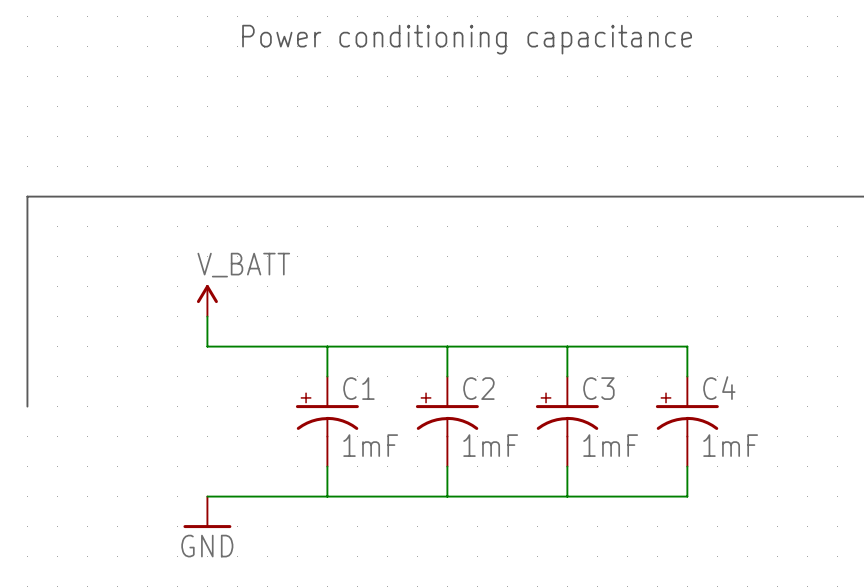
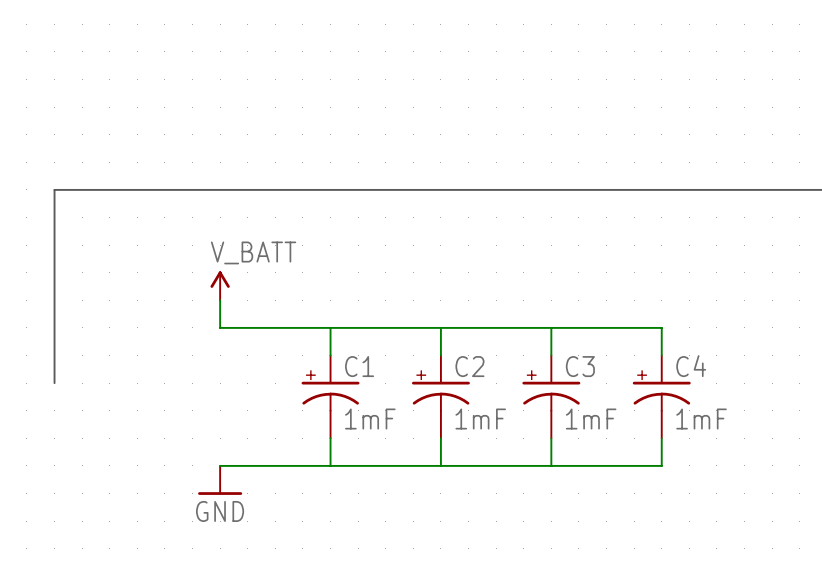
text: Power conditioning capacitance (467, 39) -> none

